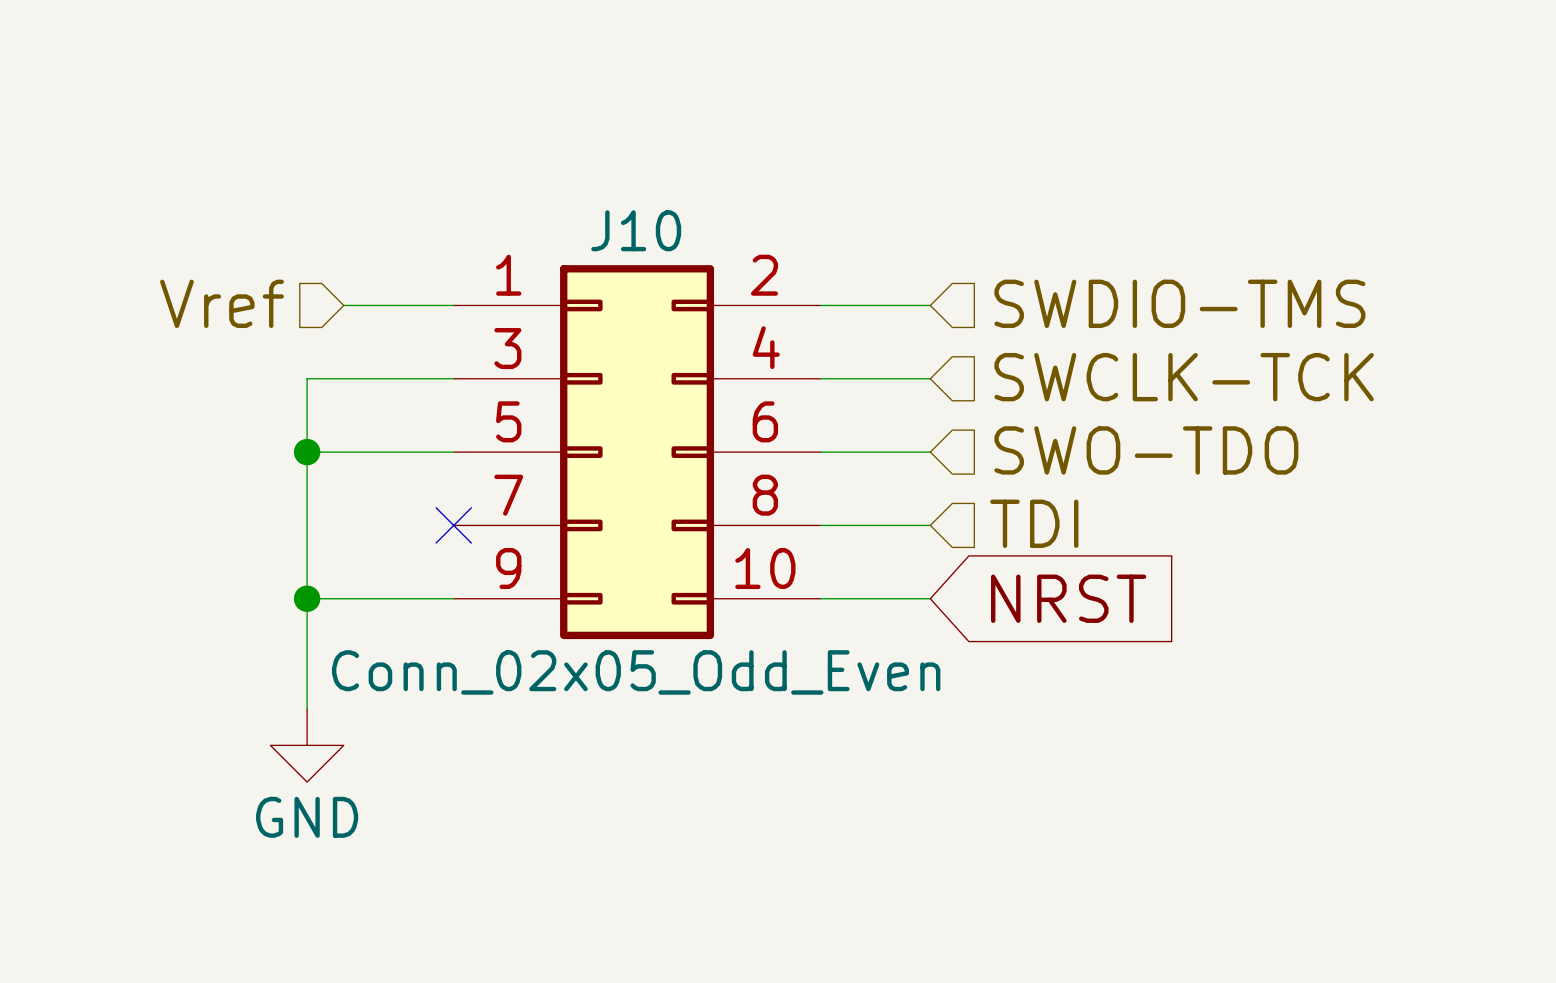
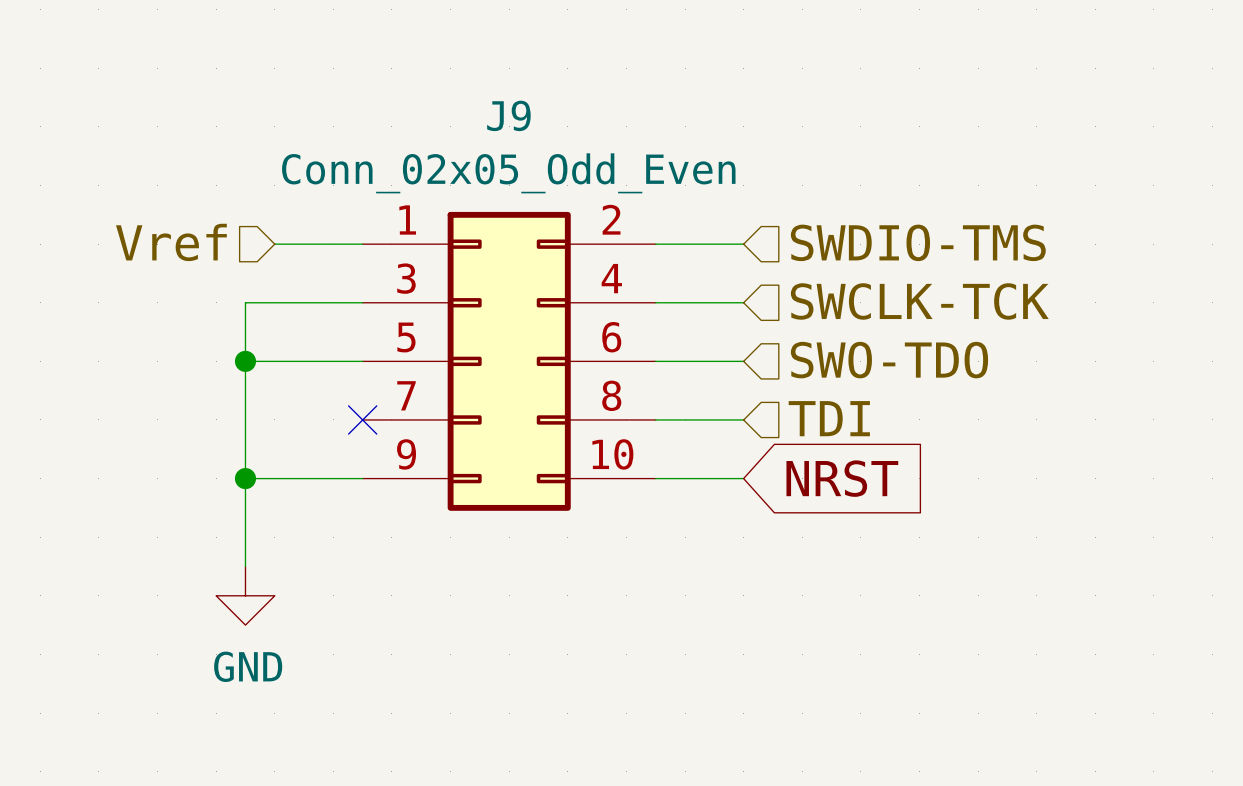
J10 name: J10 (636, 230) -> J9 (508, 115)
J10 value position: Conn_02x05_Odd_Even (636, 672) -> Conn_02x05_Odd_Even (508, 173)
power symbol text position: GND (307, 817) -> GND (248, 666)

